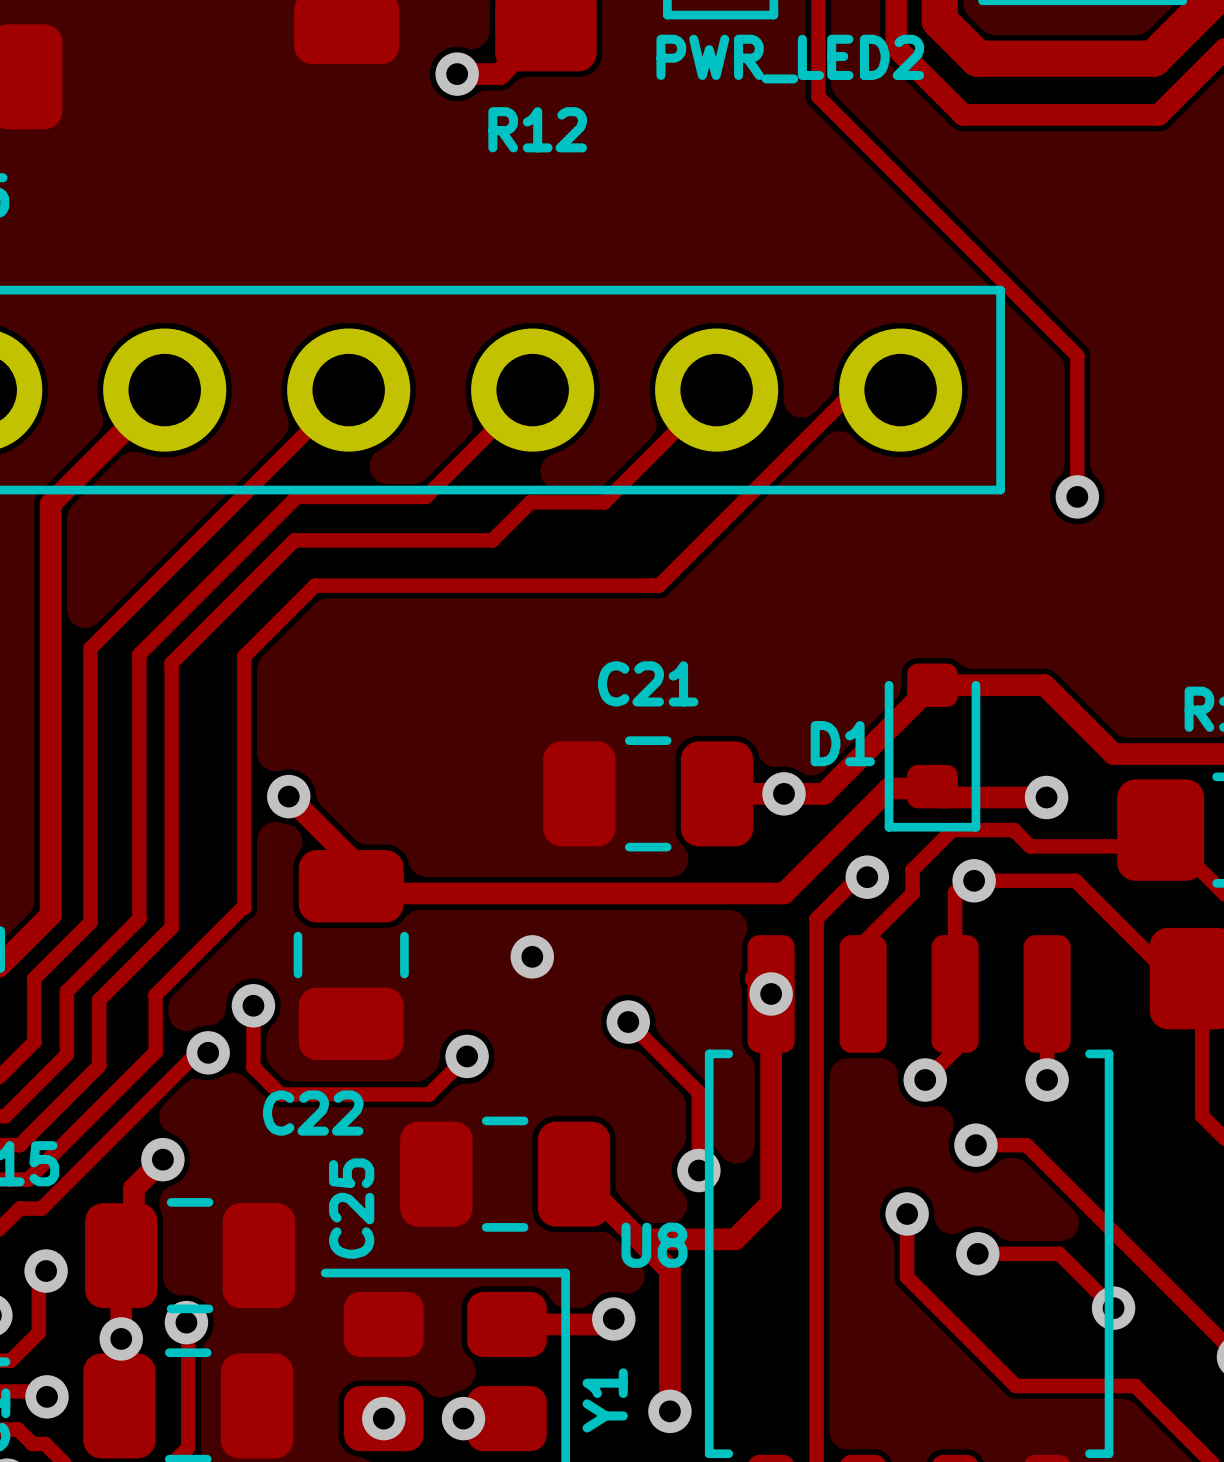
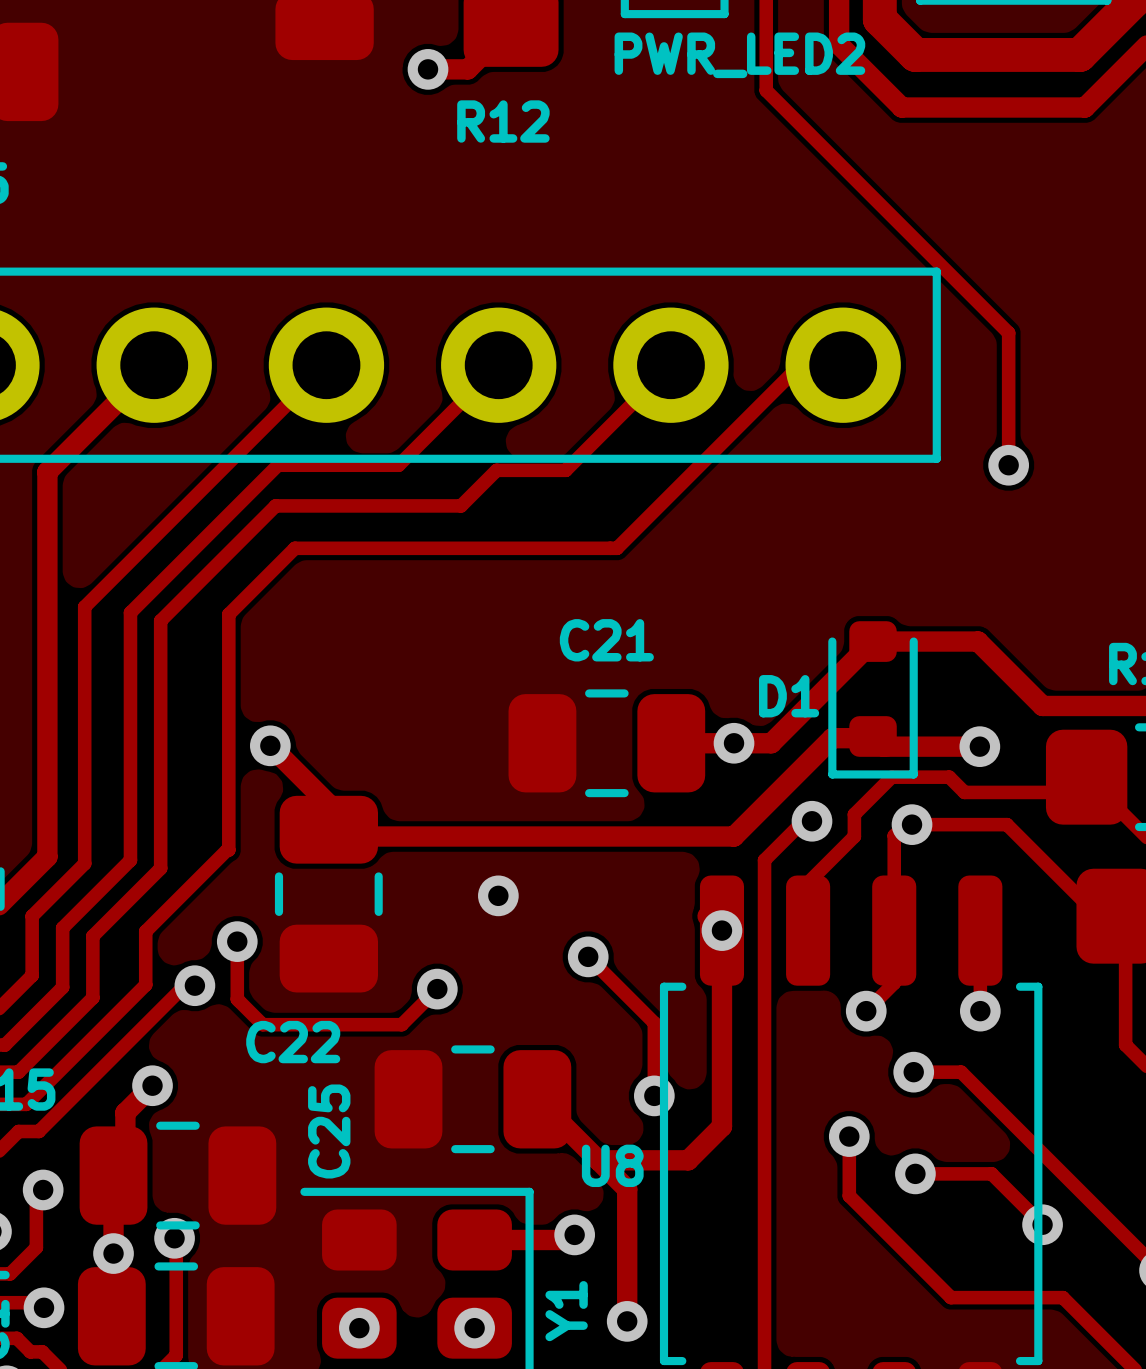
via position: (463, 1418) -> (474, 1328)

